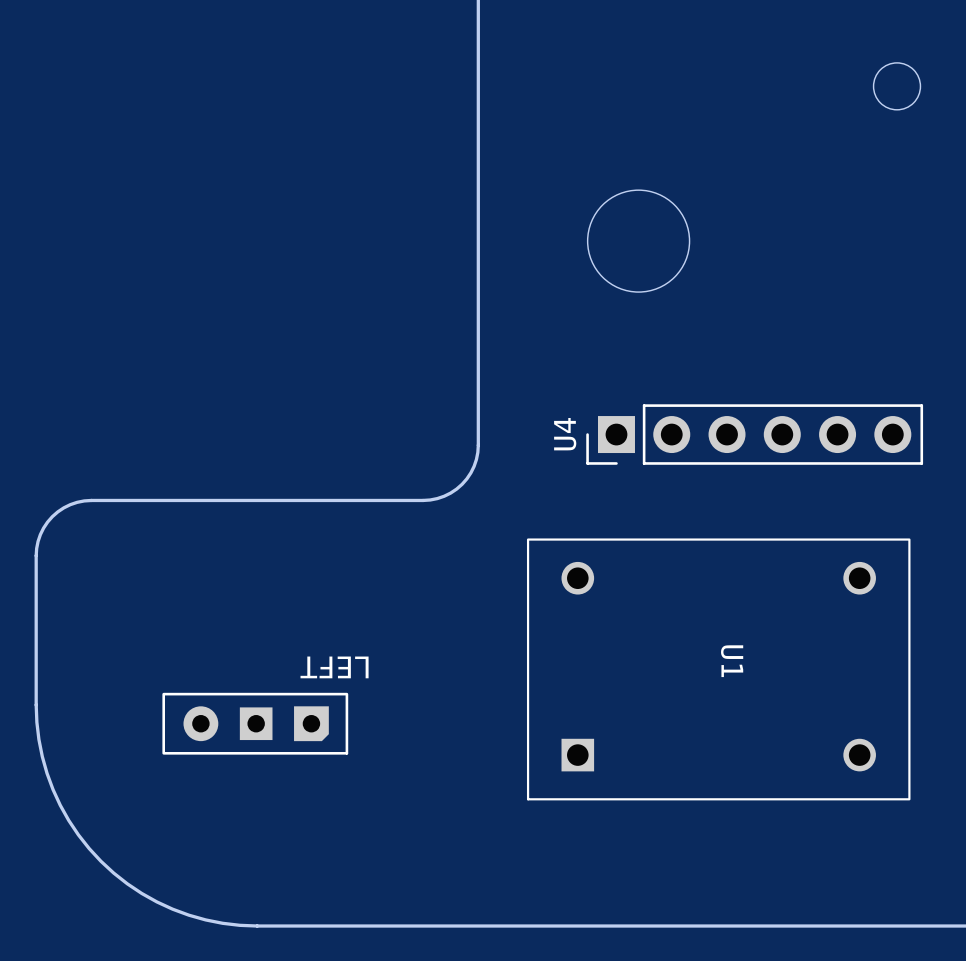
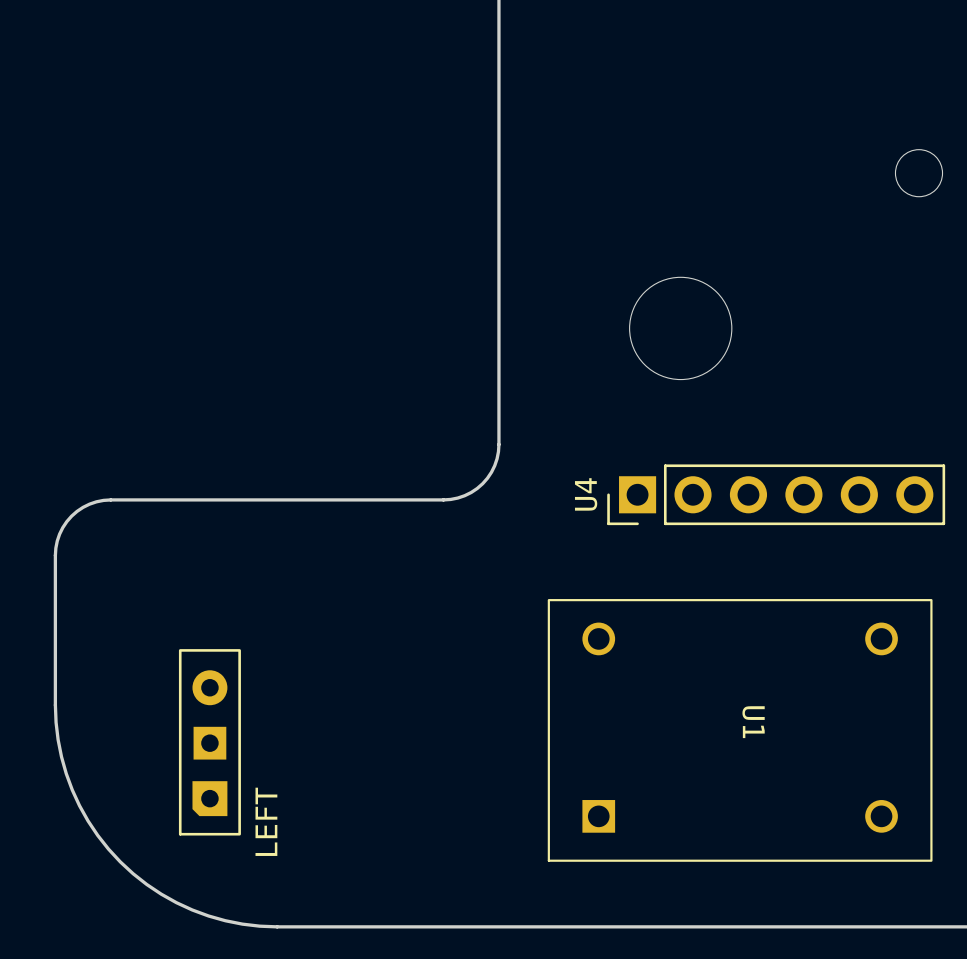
round board edge position: (897, 86) -> (919, 173)
round board edge position: (638, 241) -> (680, 328)
U4 position: (754, 434) -> (776, 494)
U1 position: (718, 669) -> (740, 730)
part rotation: 0° (255, 723) -> 90° clockwise (209, 742)

